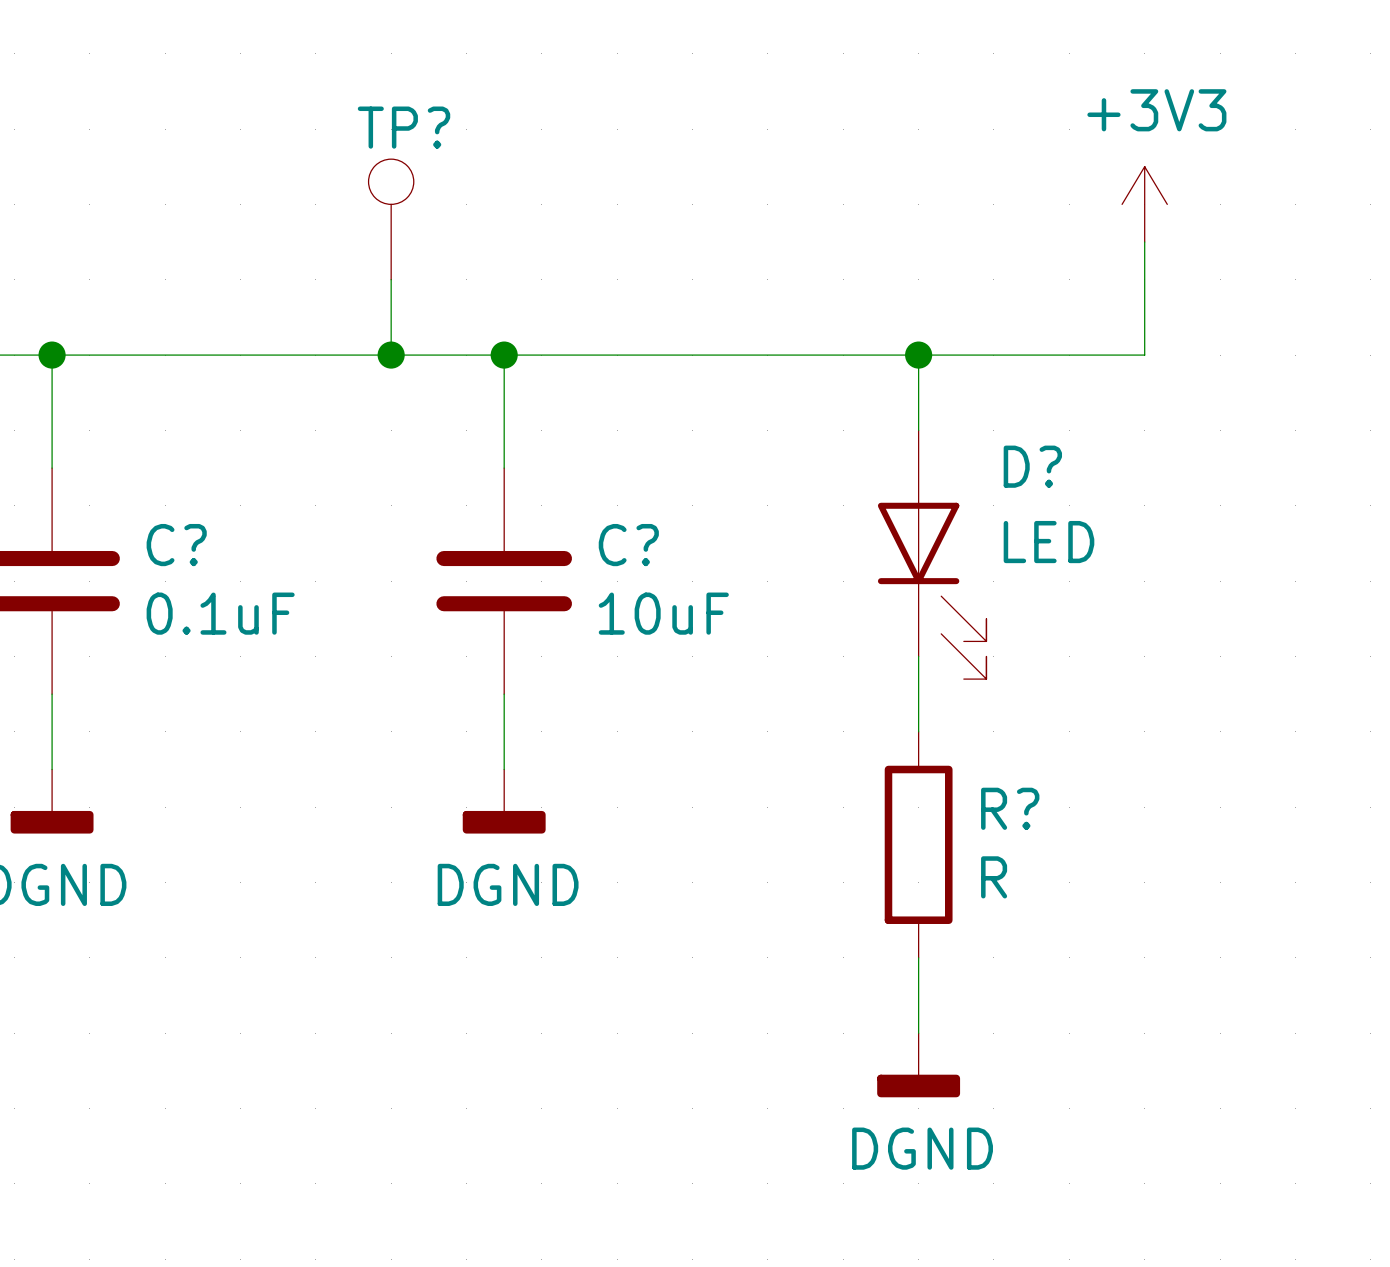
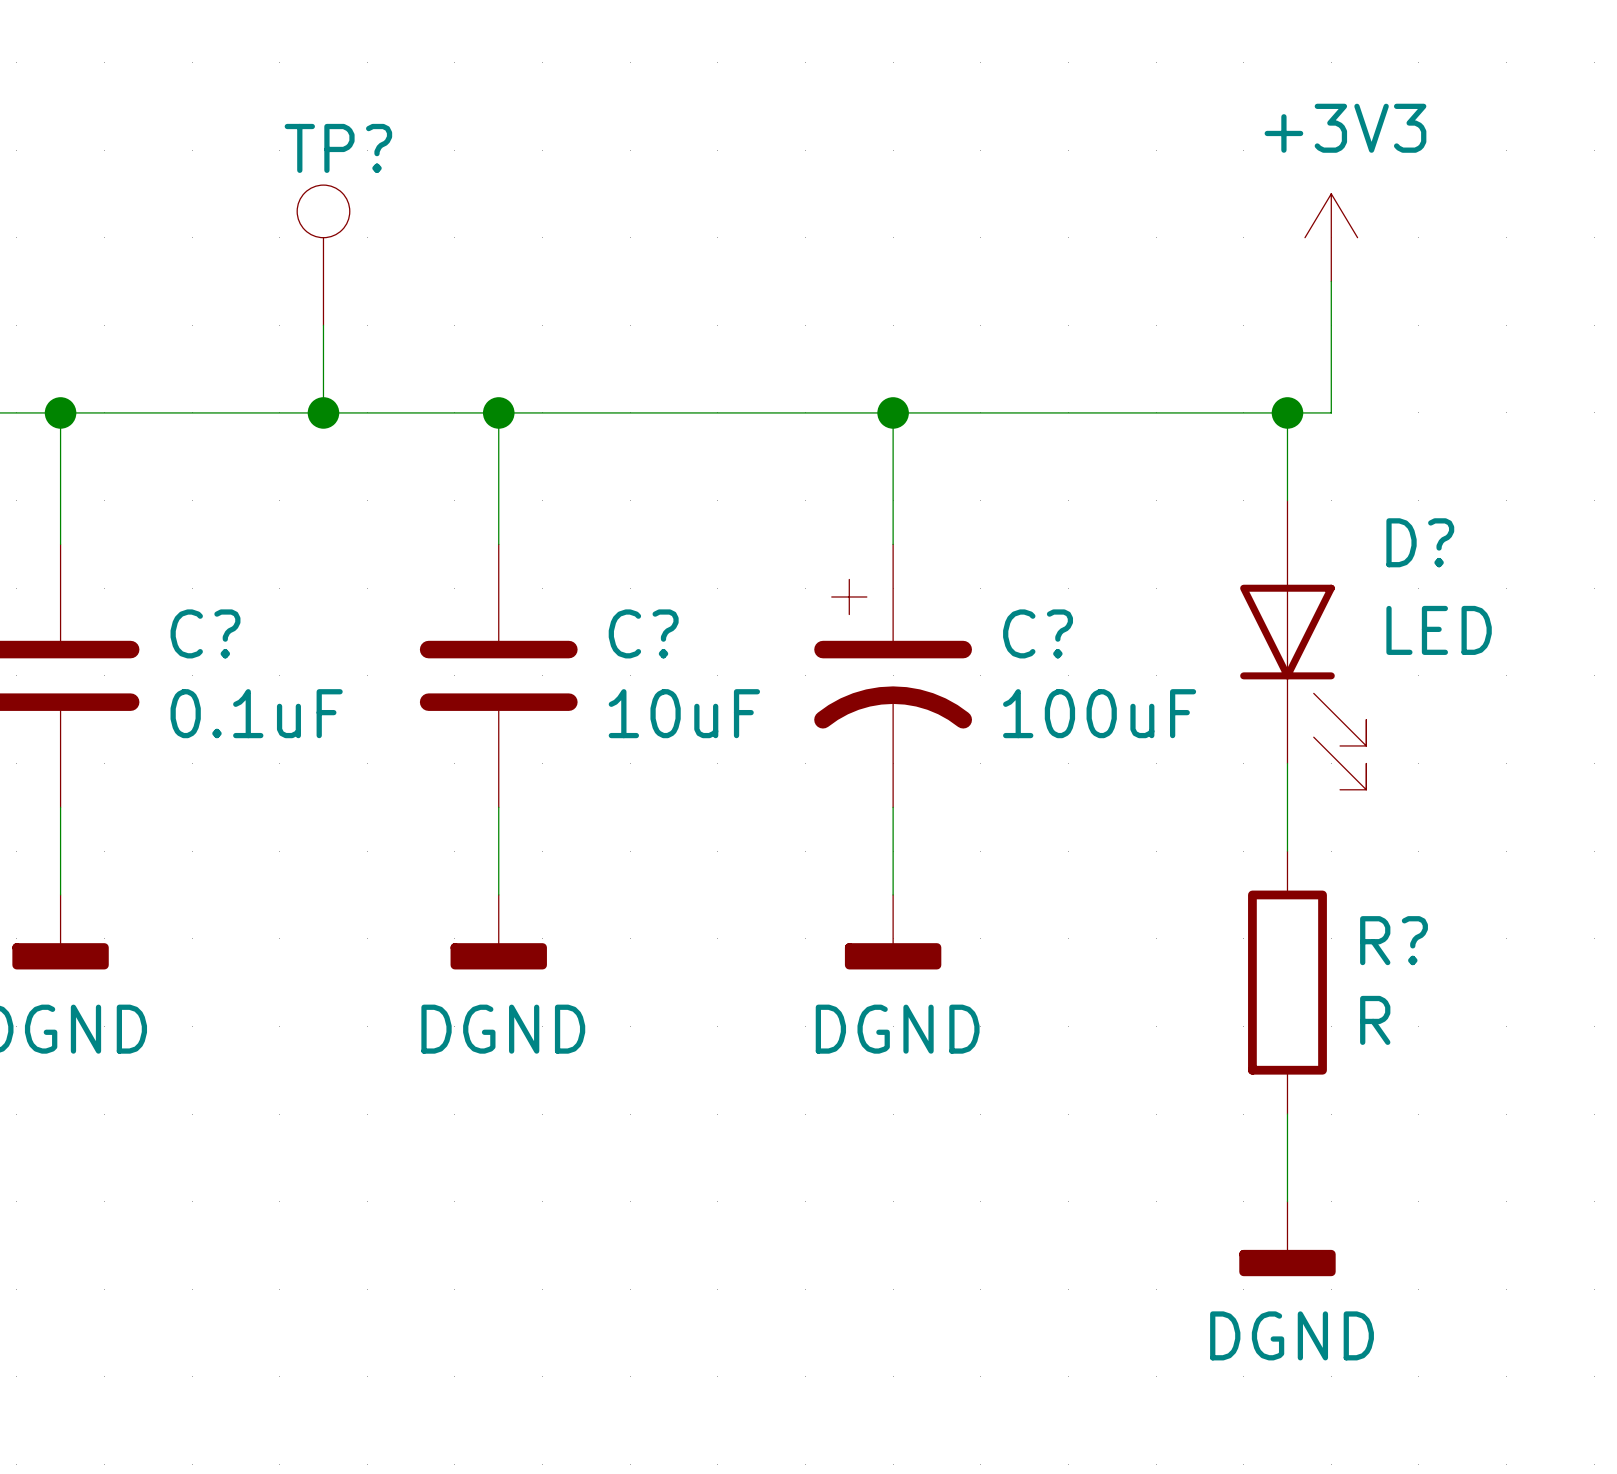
TP? position: (391, 219) -> (323, 255)
wire: (391, 279) (391, 355) -> (323, 325) (323, 412)
junction: none -> (323, 412)
junction: (391, 355) -> none
junction: none -> (498, 412)
wire: (504, 355) (504, 468) -> (498, 412) (498, 544)
junction: (504, 355) -> none
wire: none -> (893, 412) (893, 544)
junction: none -> (893, 412)
wire: (918, 355) (918, 430) -> (1287, 412) (1287, 500)
junction: (918, 355) -> none
junction: none -> (1287, 412)
D? position: (932, 554) -> (1303, 645)
C? position: (504, 581) -> (498, 675)
C?: none -> 100uF (893, 675)
wire: (918, 656) (918, 731) -> (1287, 763) (1287, 851)
wire: (504, 694) (504, 769) -> (498, 807) (498, 894)
wire: none -> (893, 807) (893, 894)
power symbol position: DGND (504, 801) -> DGND (498, 932)
power symbol: none -> DGND (893, 932)
R? position: (918, 844) -> (1287, 982)
wire: (918, 957) (918, 1033) -> (1287, 1114) (1287, 1201)
power symbol: DGND (918, 1065) -> none
power symbol: none -> DGND (1287, 1238)

